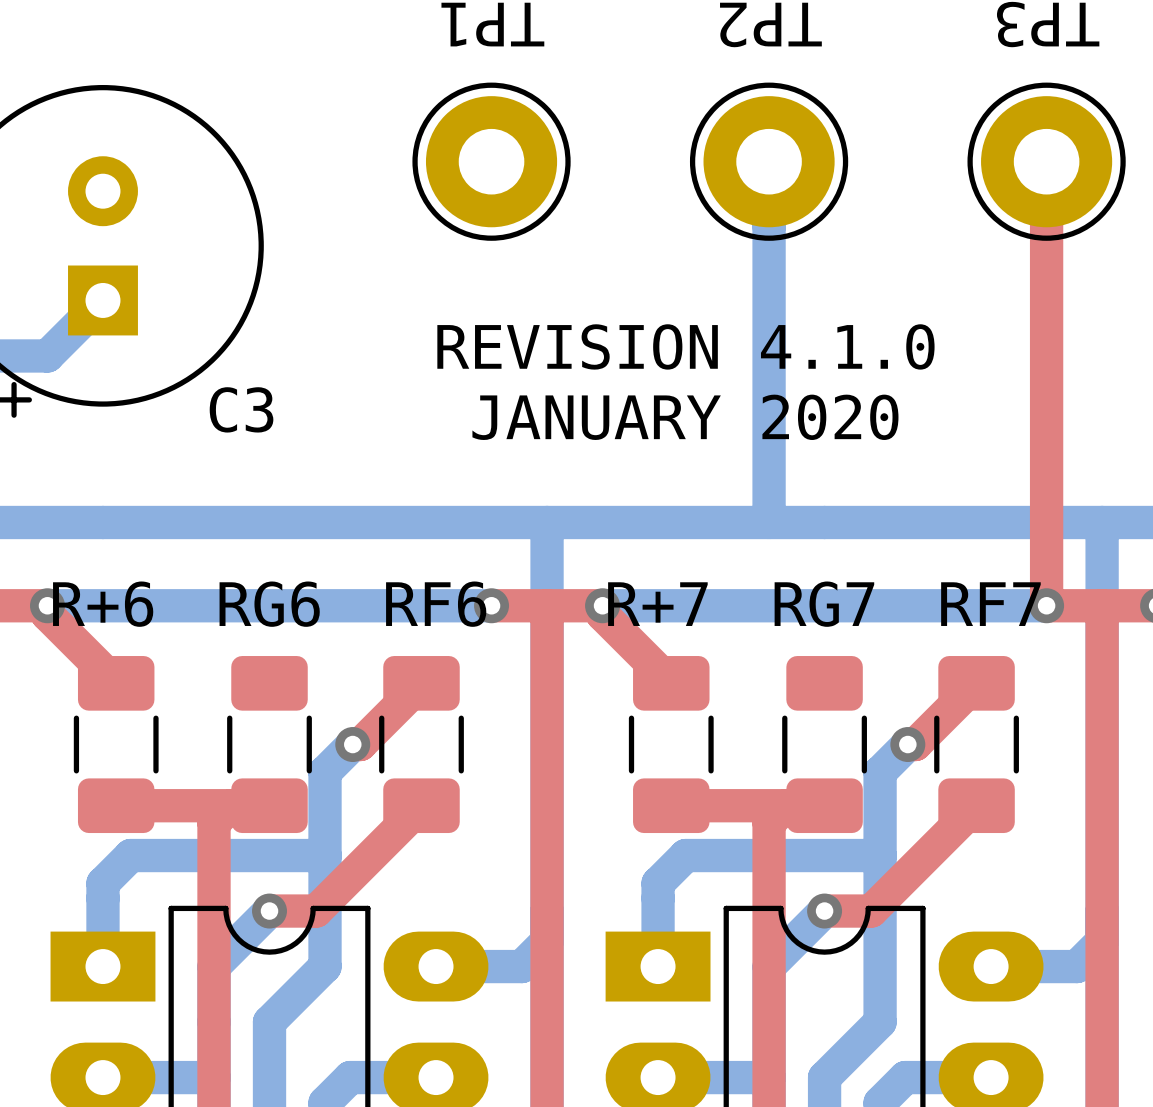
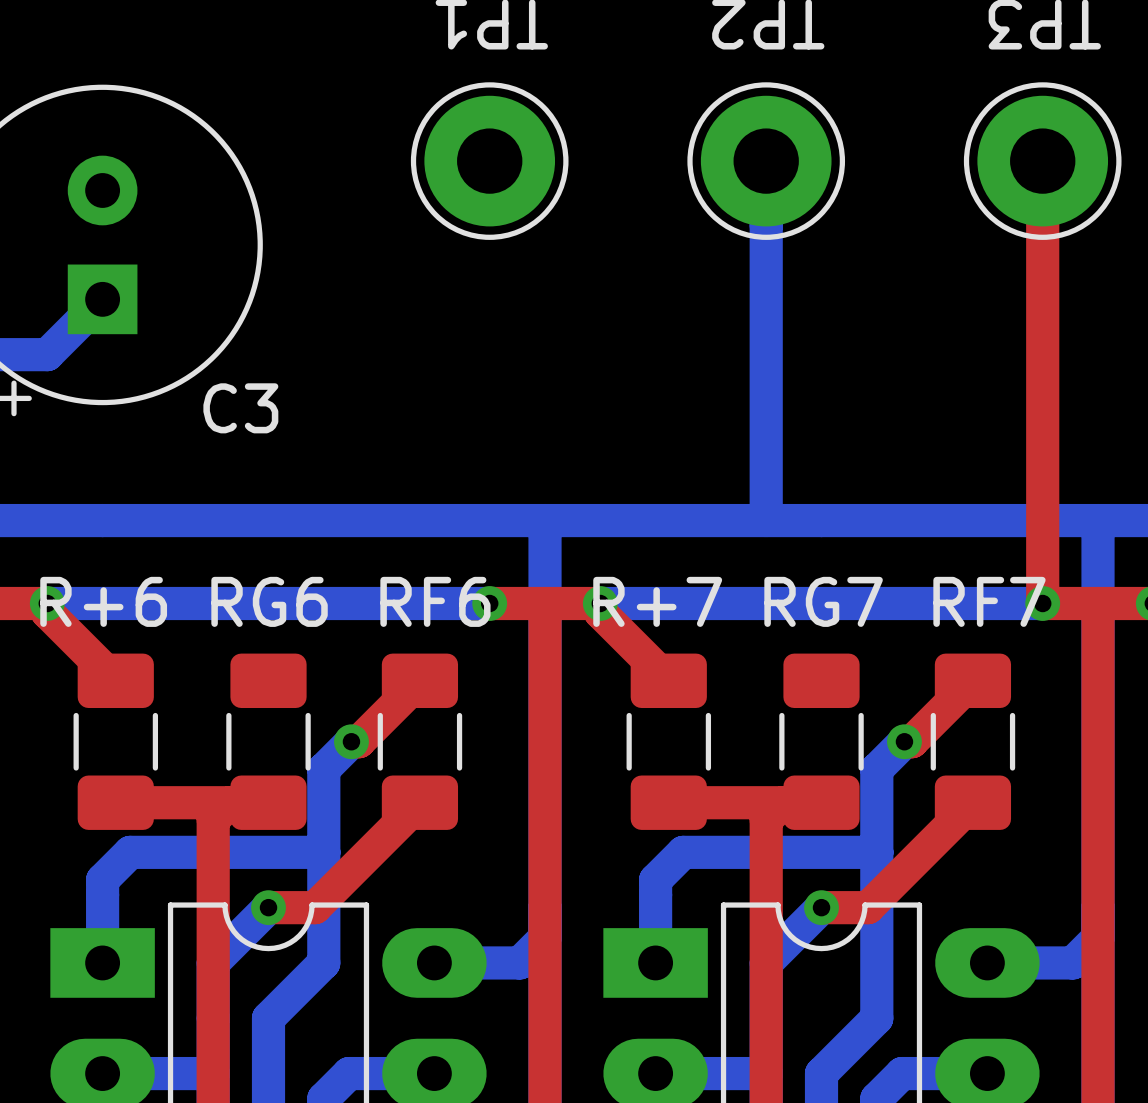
text: REVISION 4.1.0 (685, 346) -> none
text: JANUARY 2020 (685, 417) -> none

